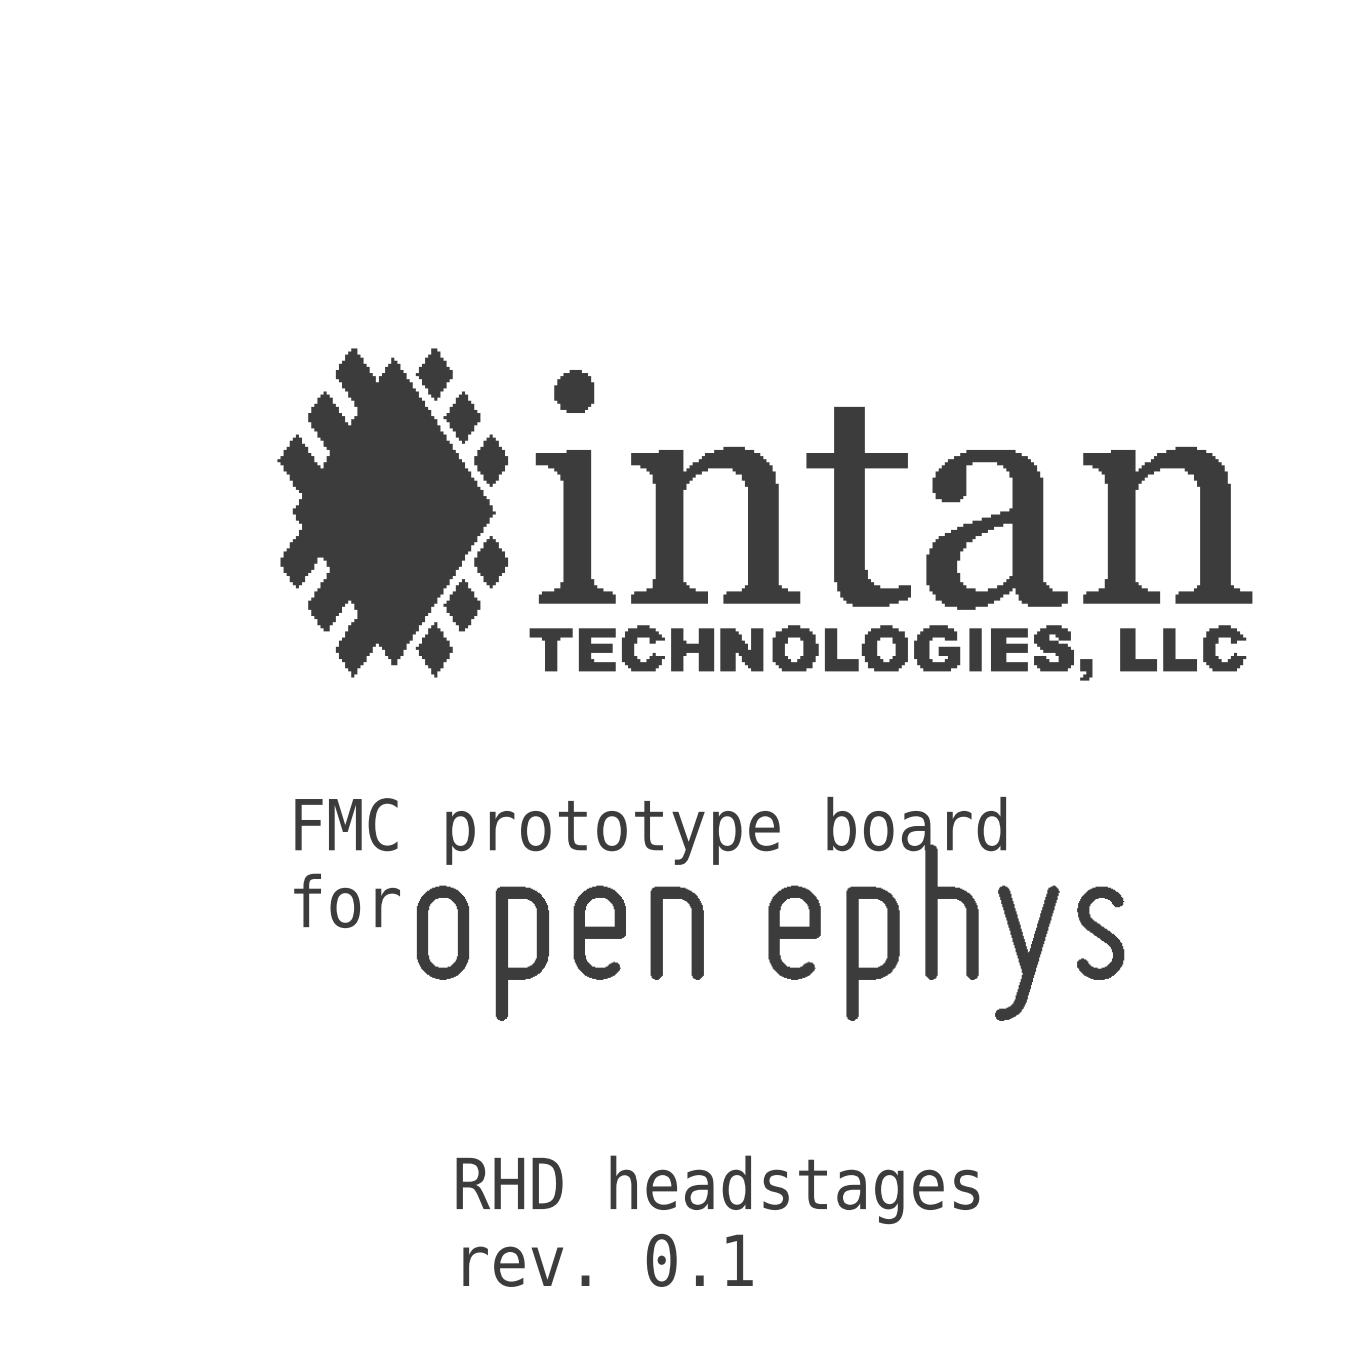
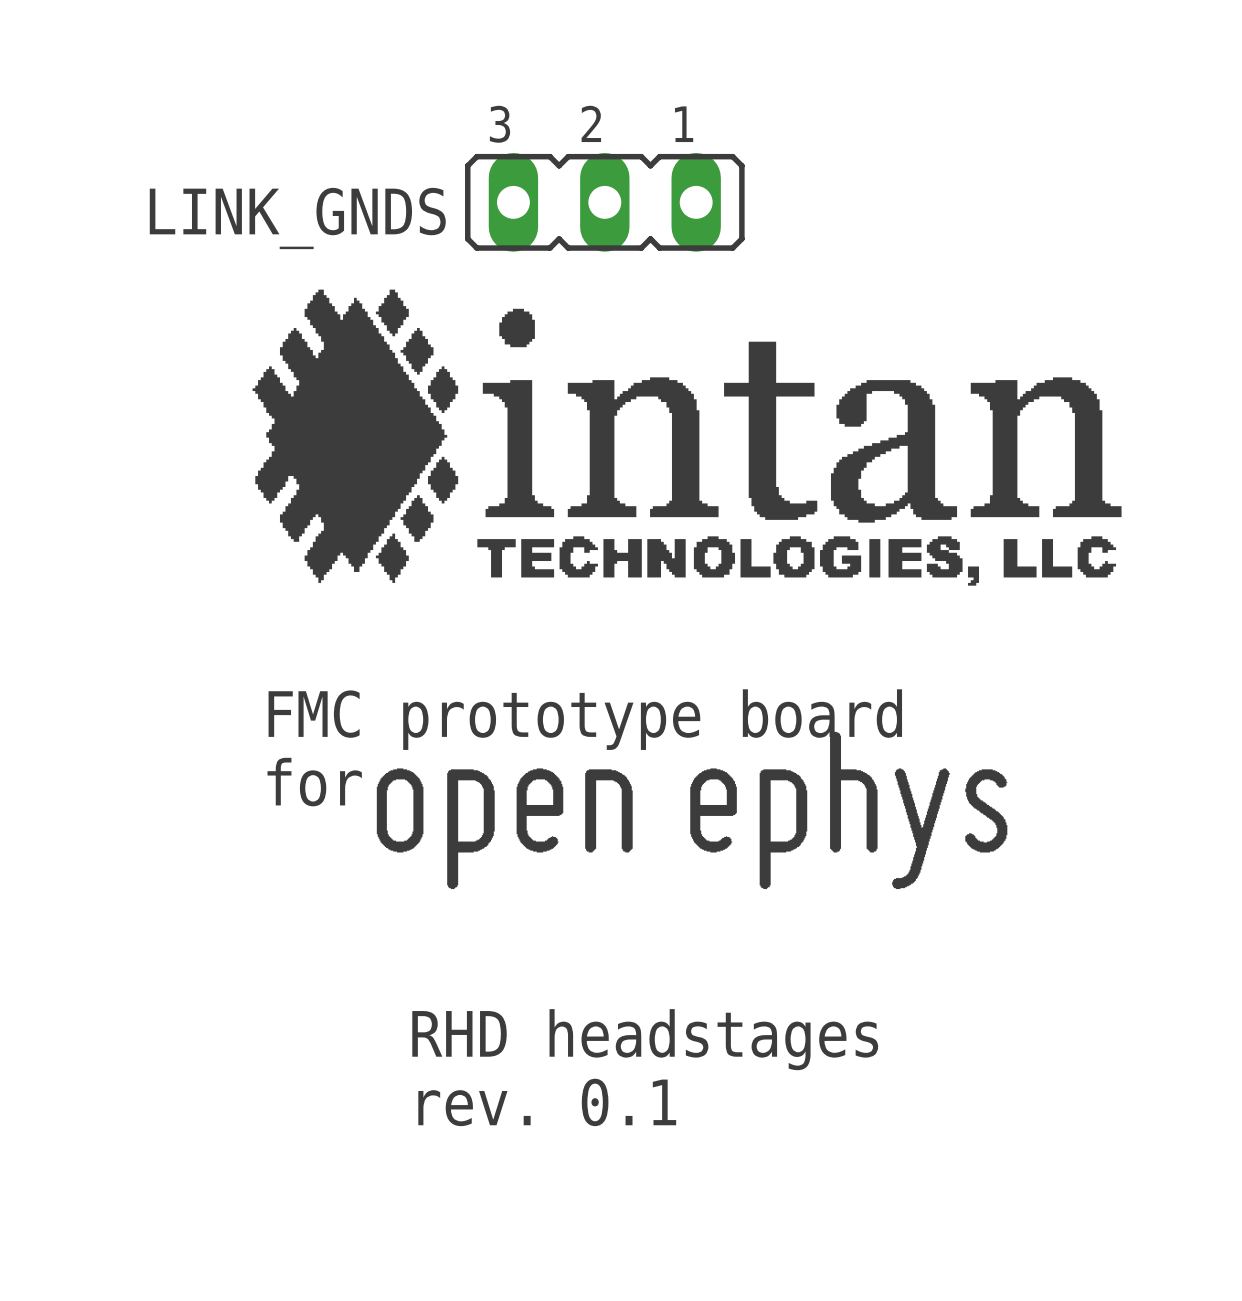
LINK_GNDS: none -> (604, 202)

